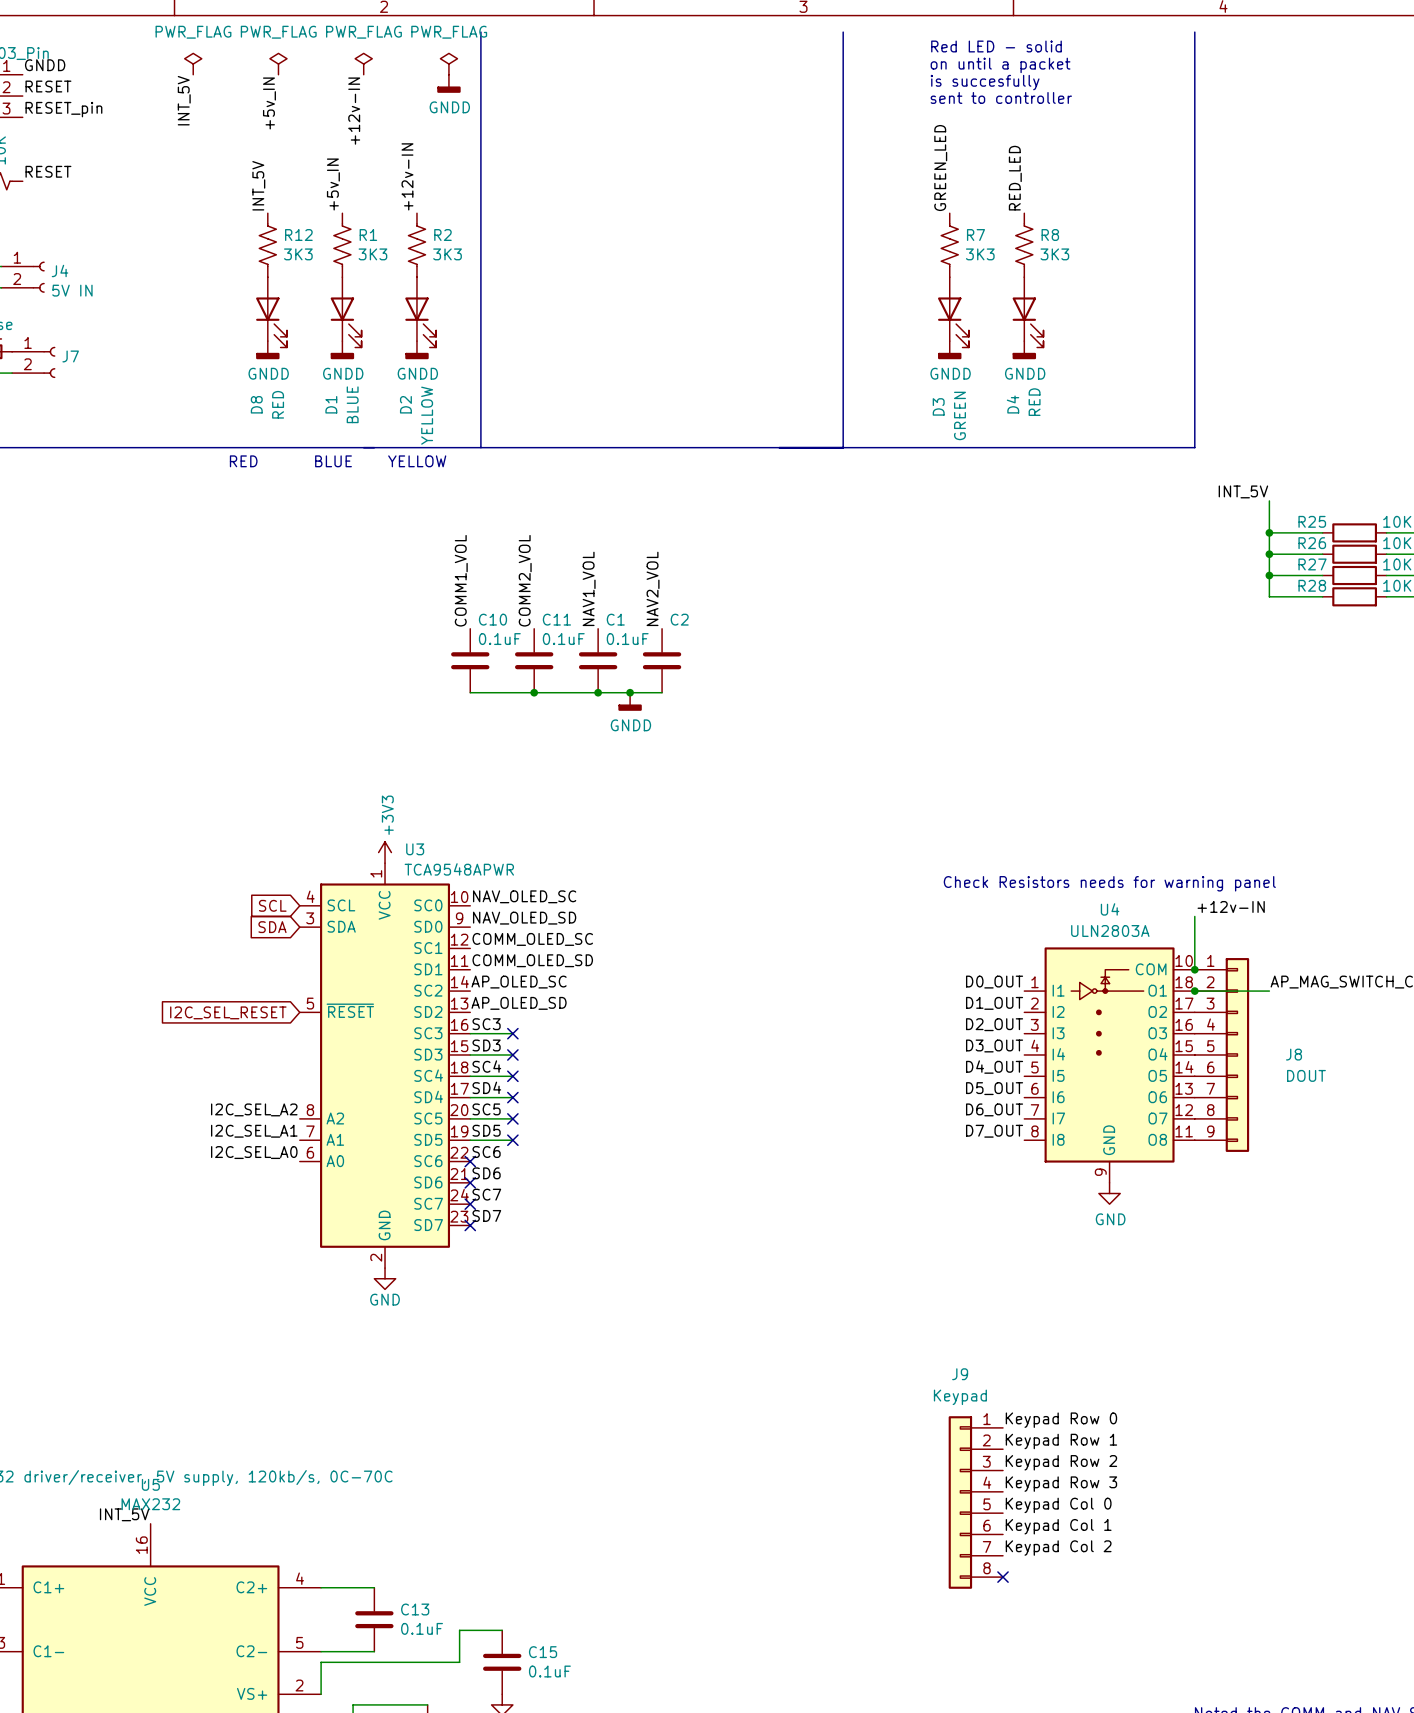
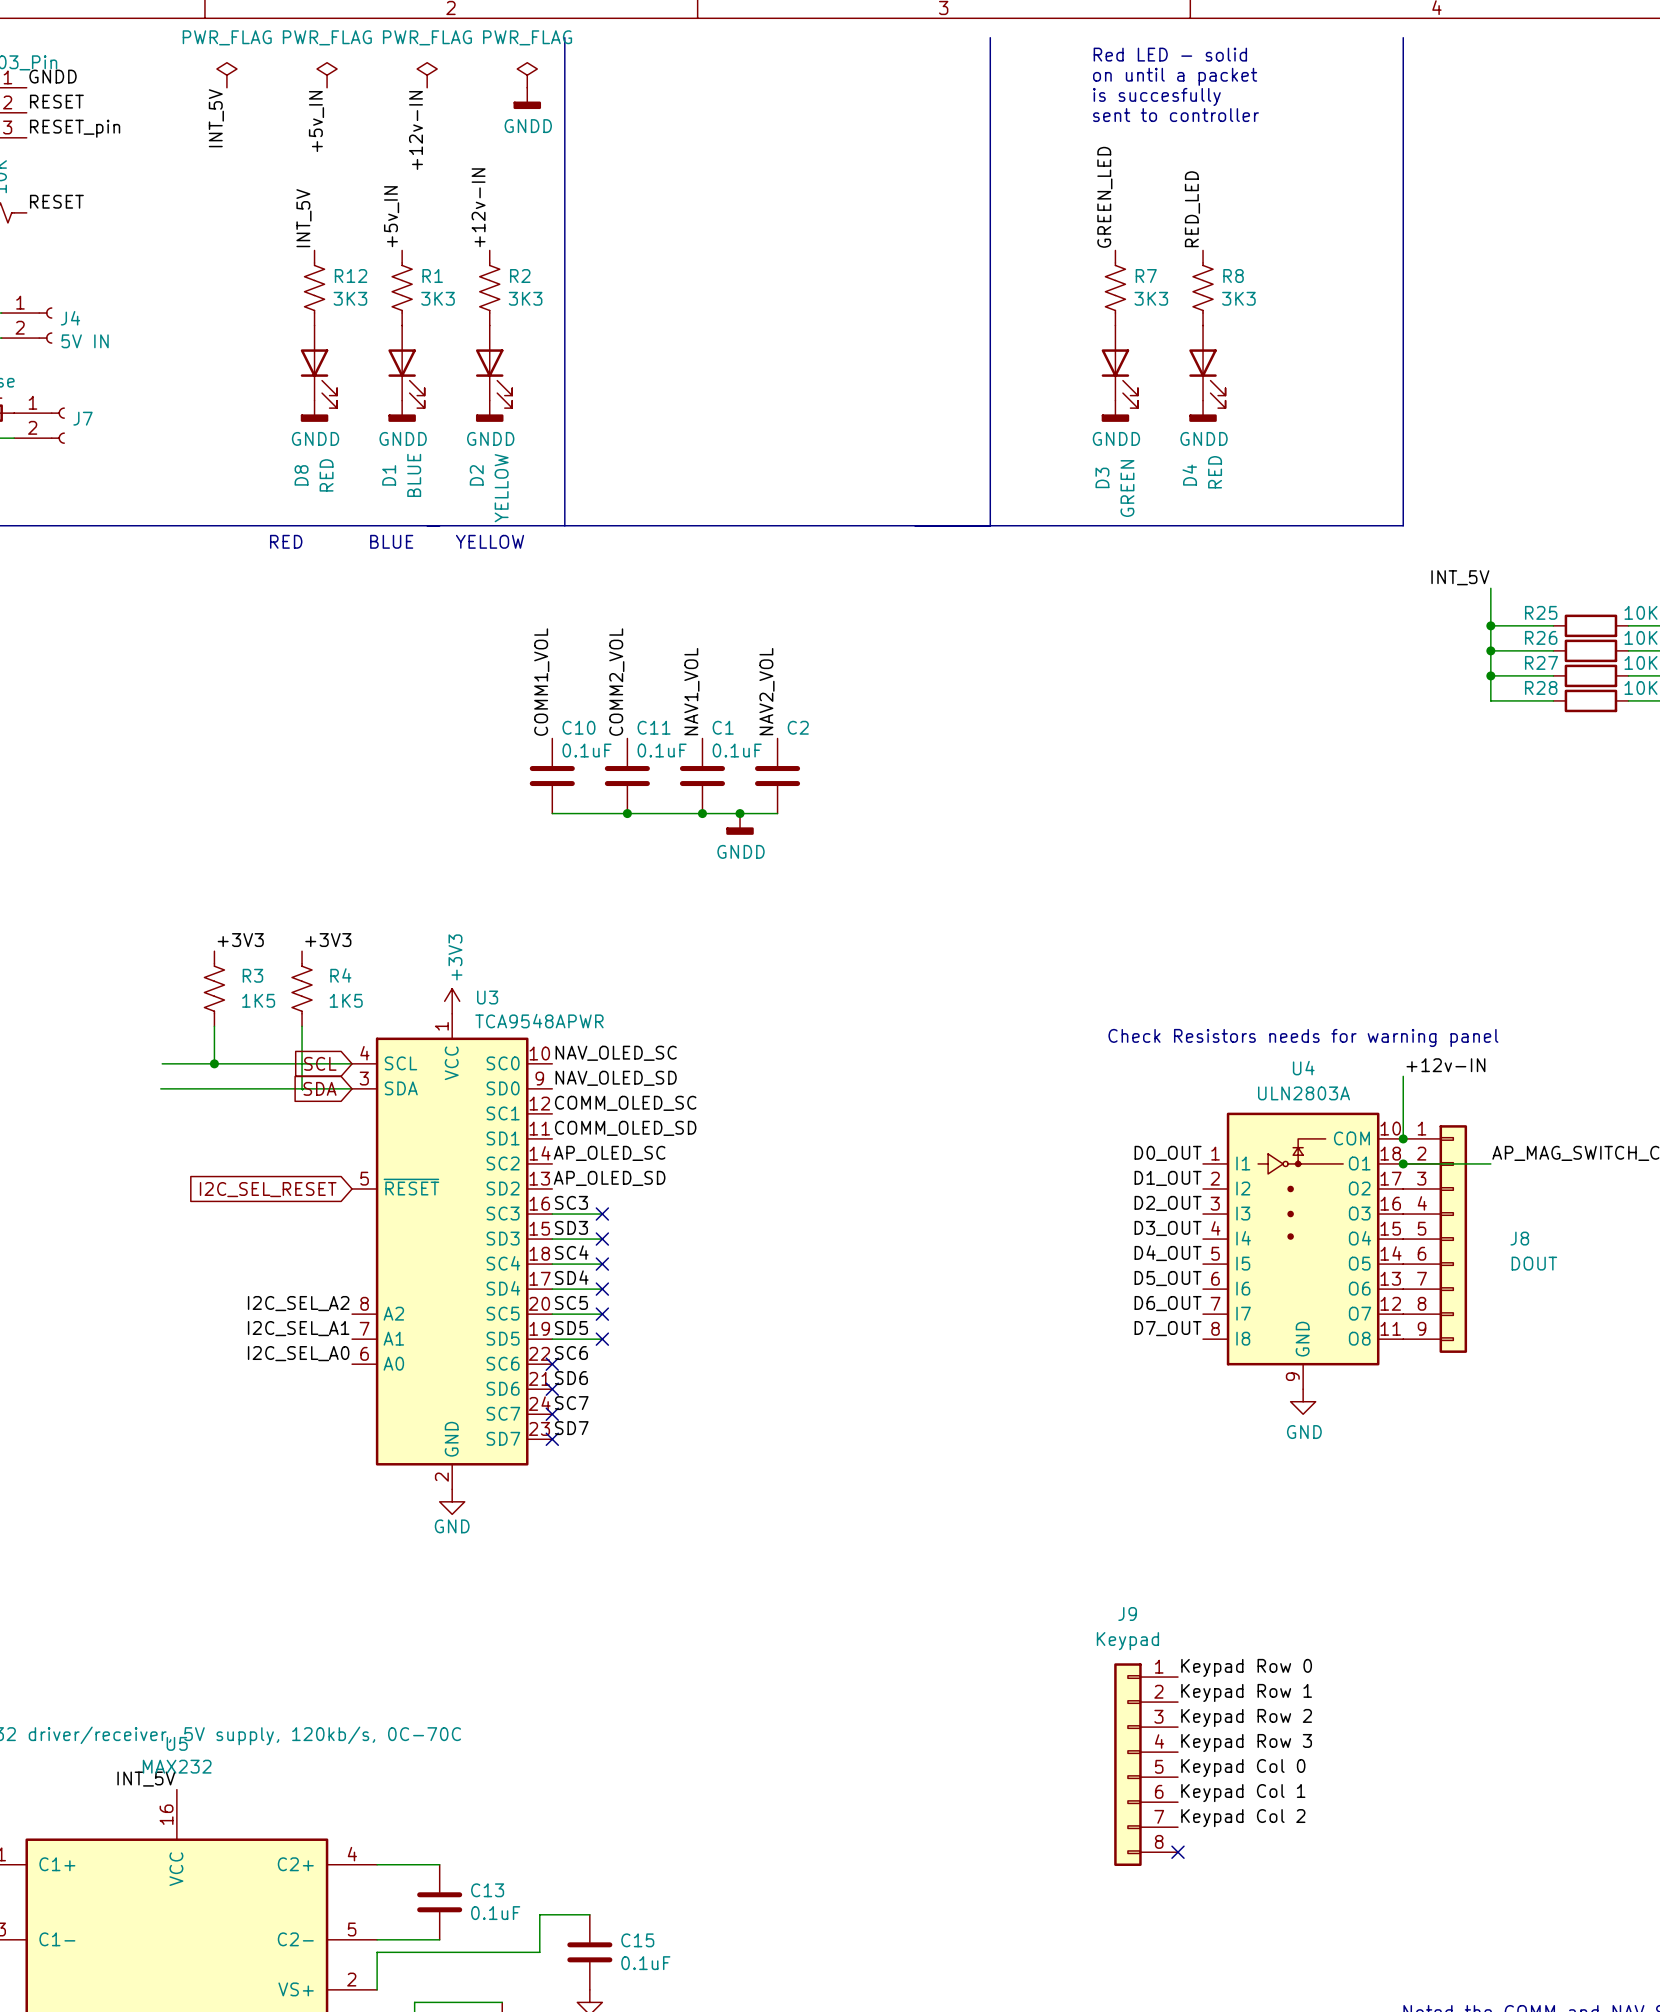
label: none -> +3V3 (240, 940)
label: none -> +3V3 (328, 940)
R3: none -> 1K5 (214, 988)
R4: none -> 1K5 (302, 988)
wire: none -> (214, 1026) (214, 1063)
wire: none -> (302, 1026) (302, 1088)
wire: none -> (162, 1063) (352, 1063)
junction: none -> (214, 1063)
wire: none -> (160, 1088) (352, 1088)

